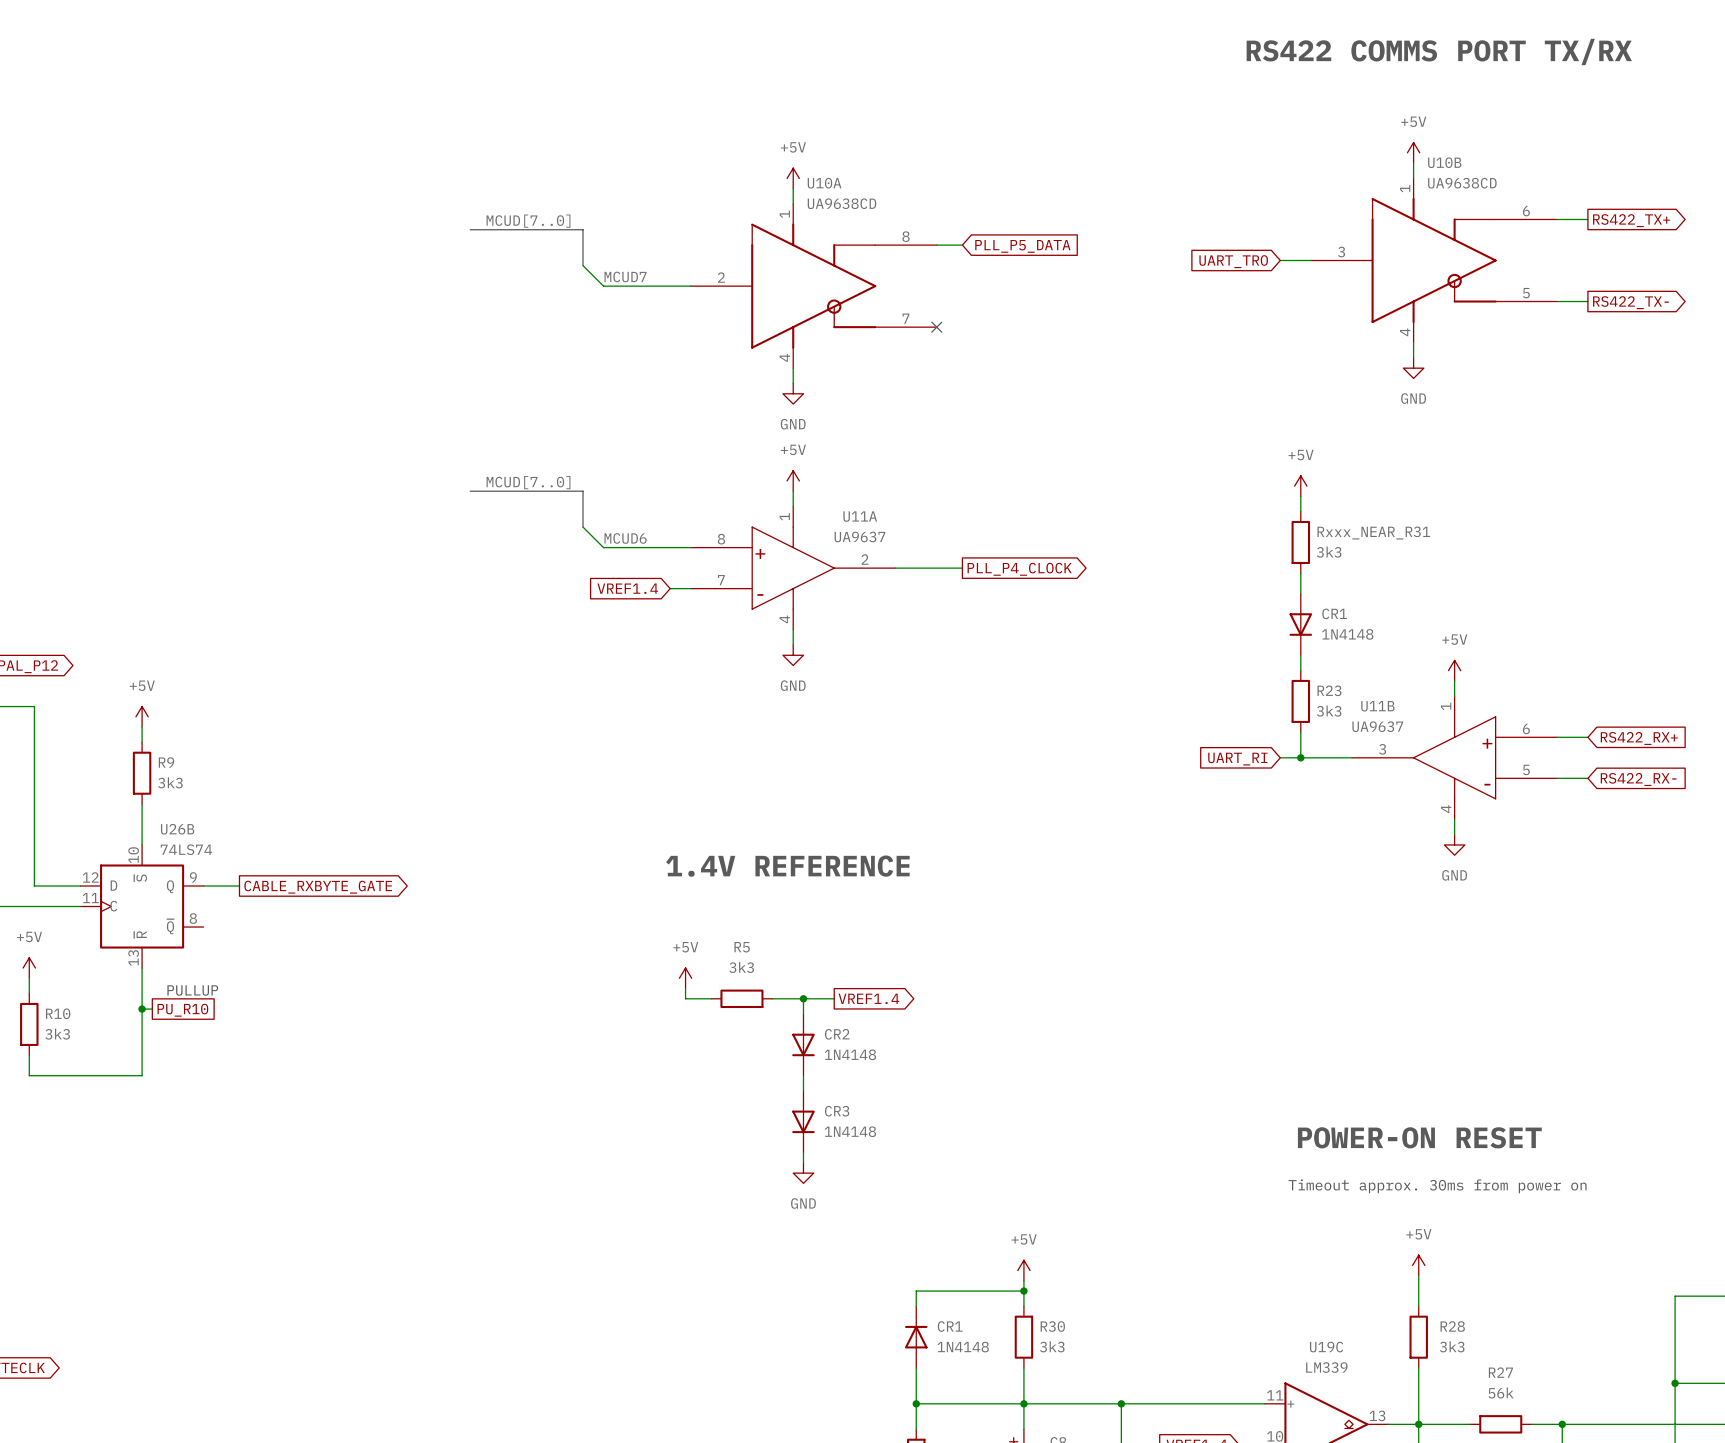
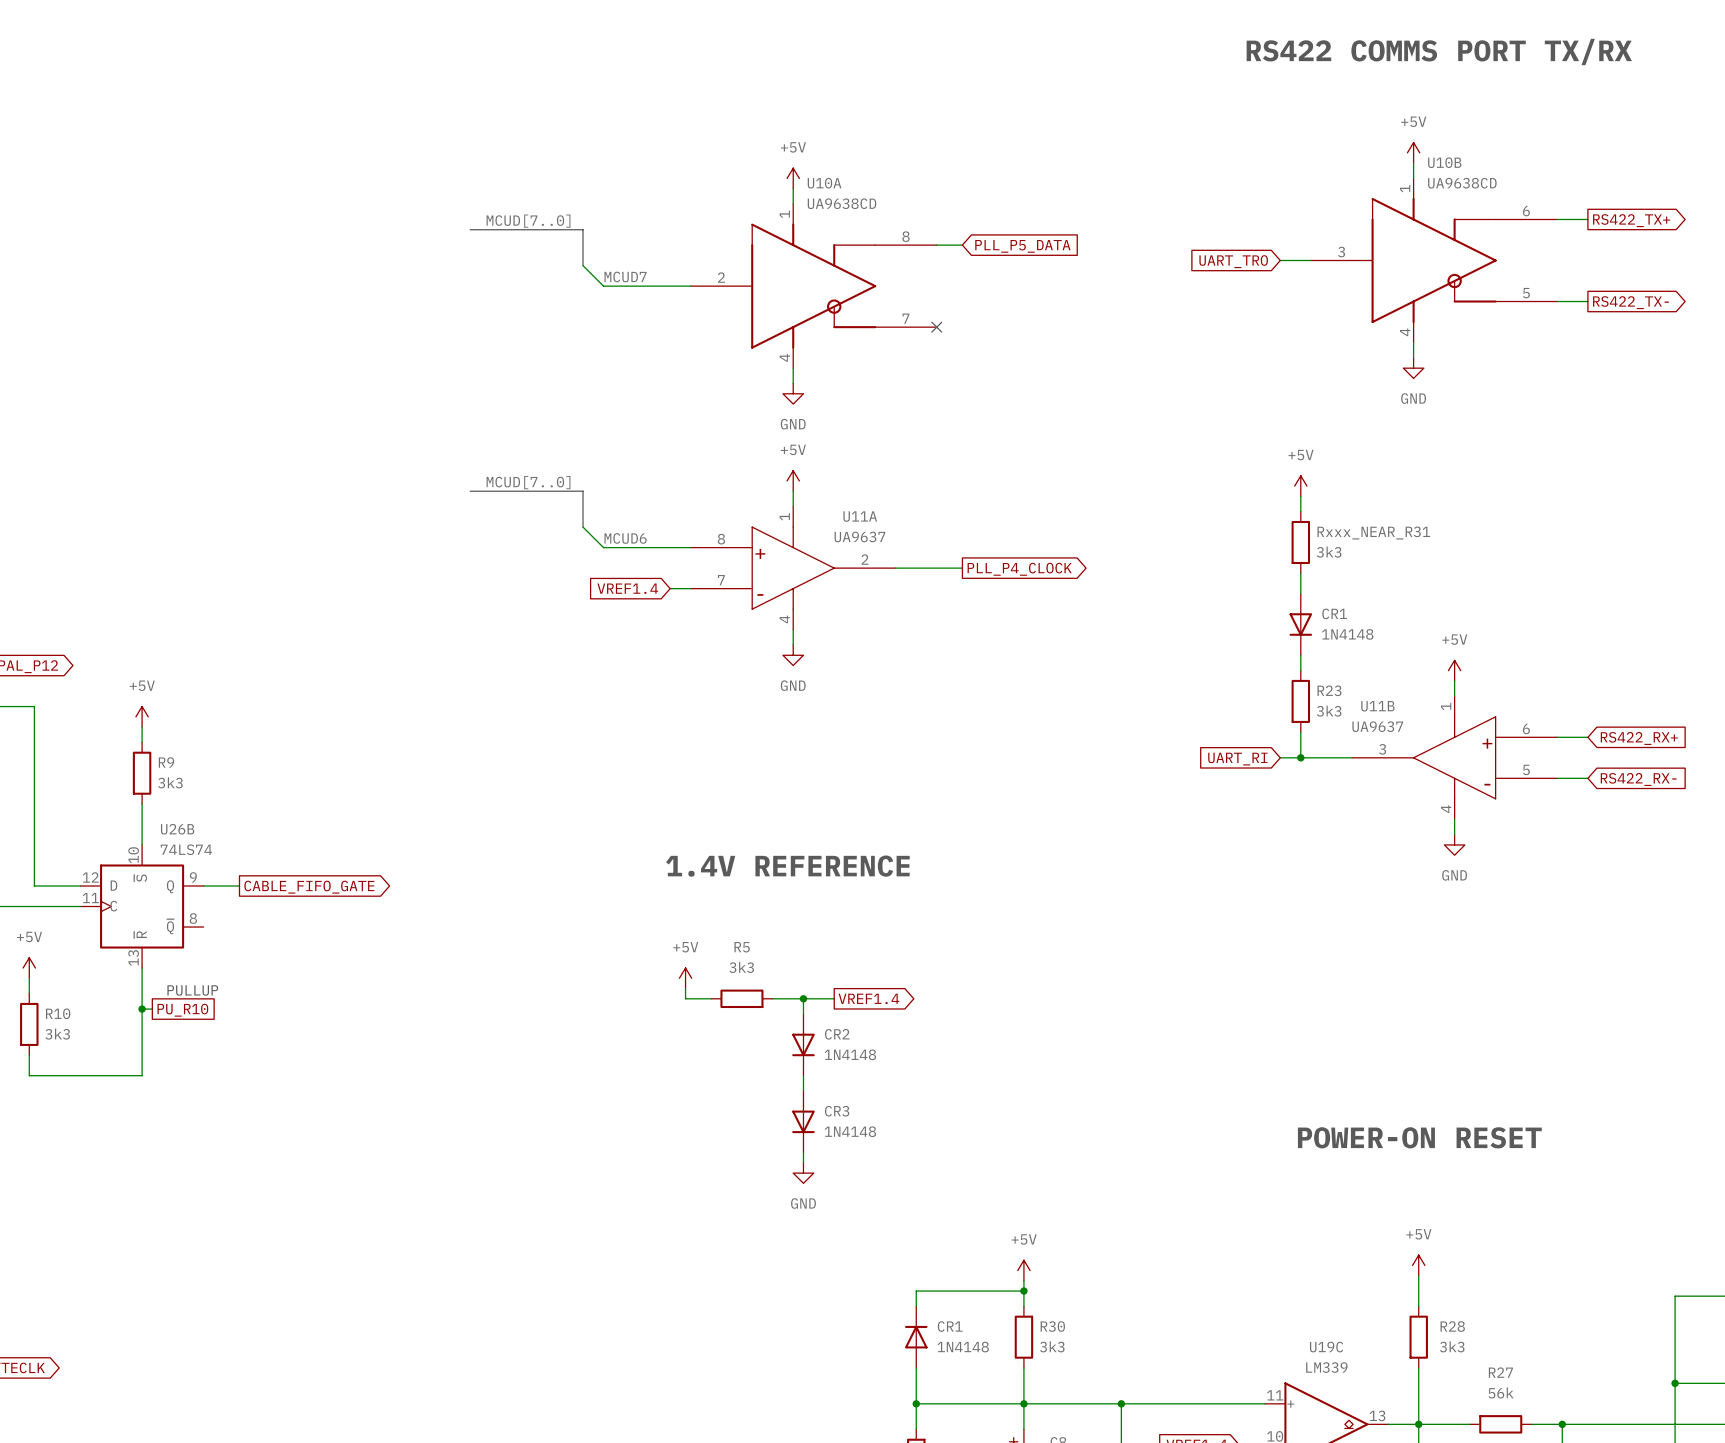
global label: CABLE_RXBYTE_GATE (318, 887) -> CABLE_FIFO_GATE (309, 887)
text: Timeout approx. 30ms from power on (1437, 1186) -> none

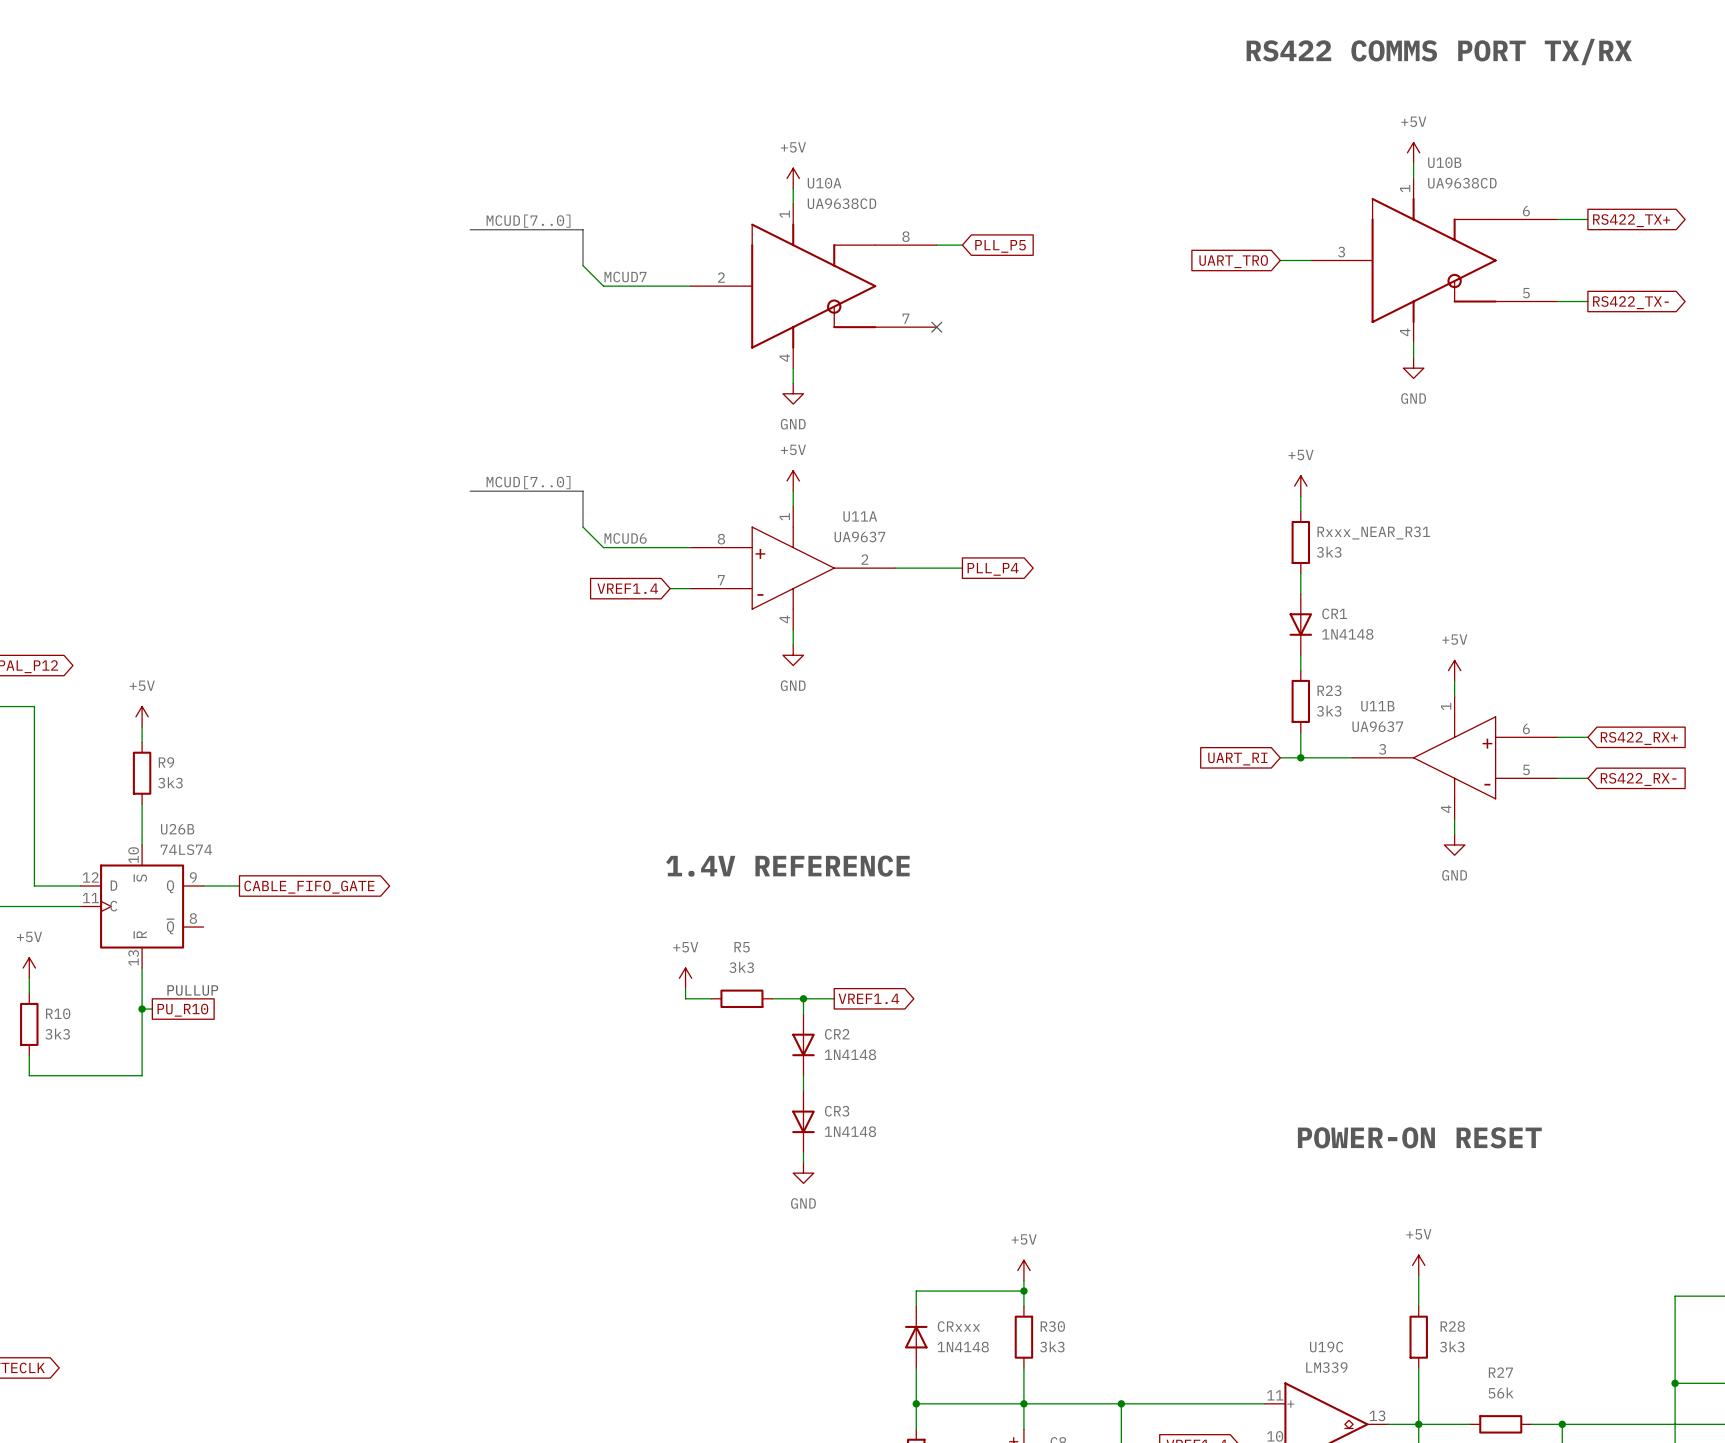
global label: PLL_P5_DATA (1022, 246) -> PLL_P5 (1000, 246)
global label: PLL_P4_CLOCK (1019, 569) -> PLL_P4 (993, 569)
CR1 name: CR1 (950, 1326) -> CRxxx (958, 1326)

